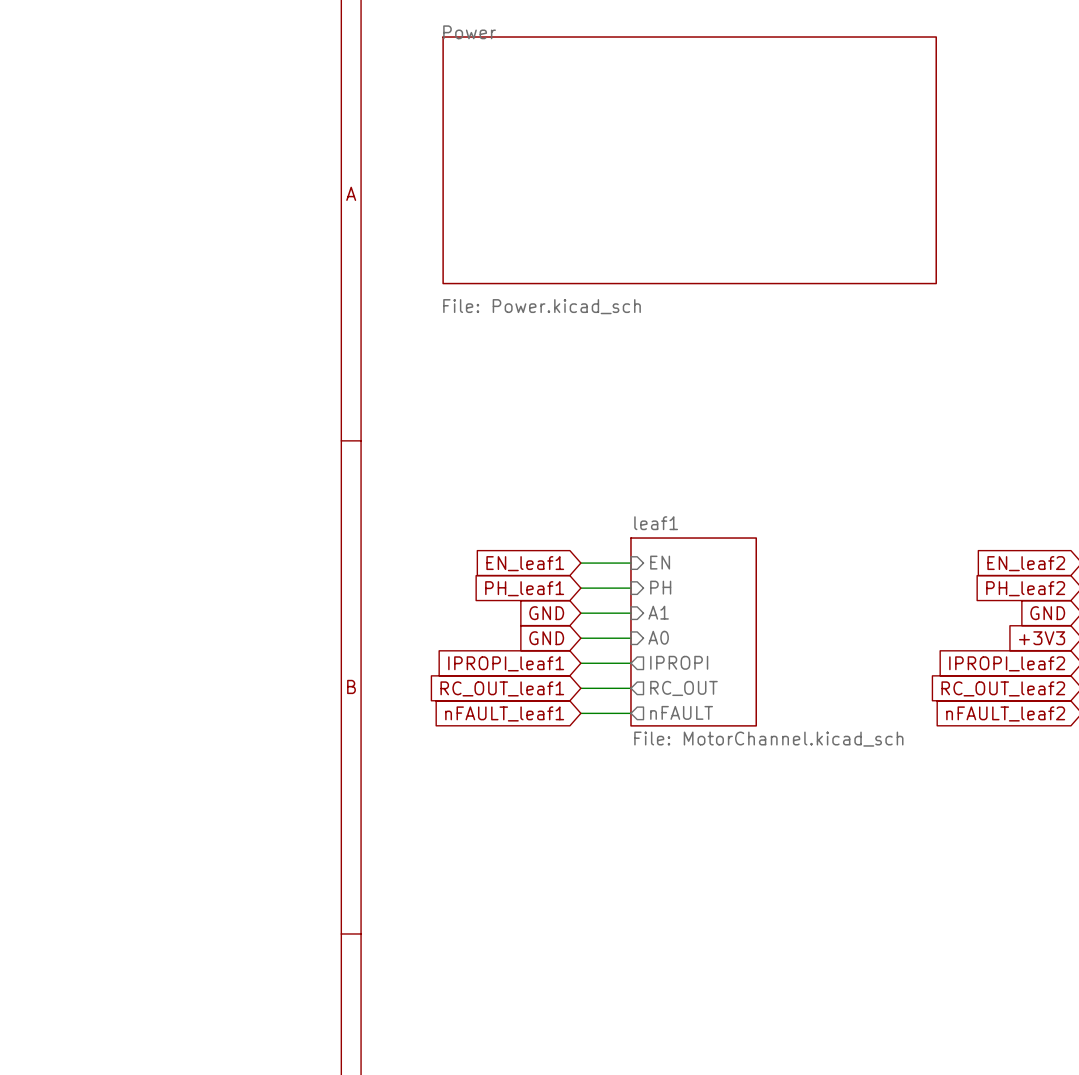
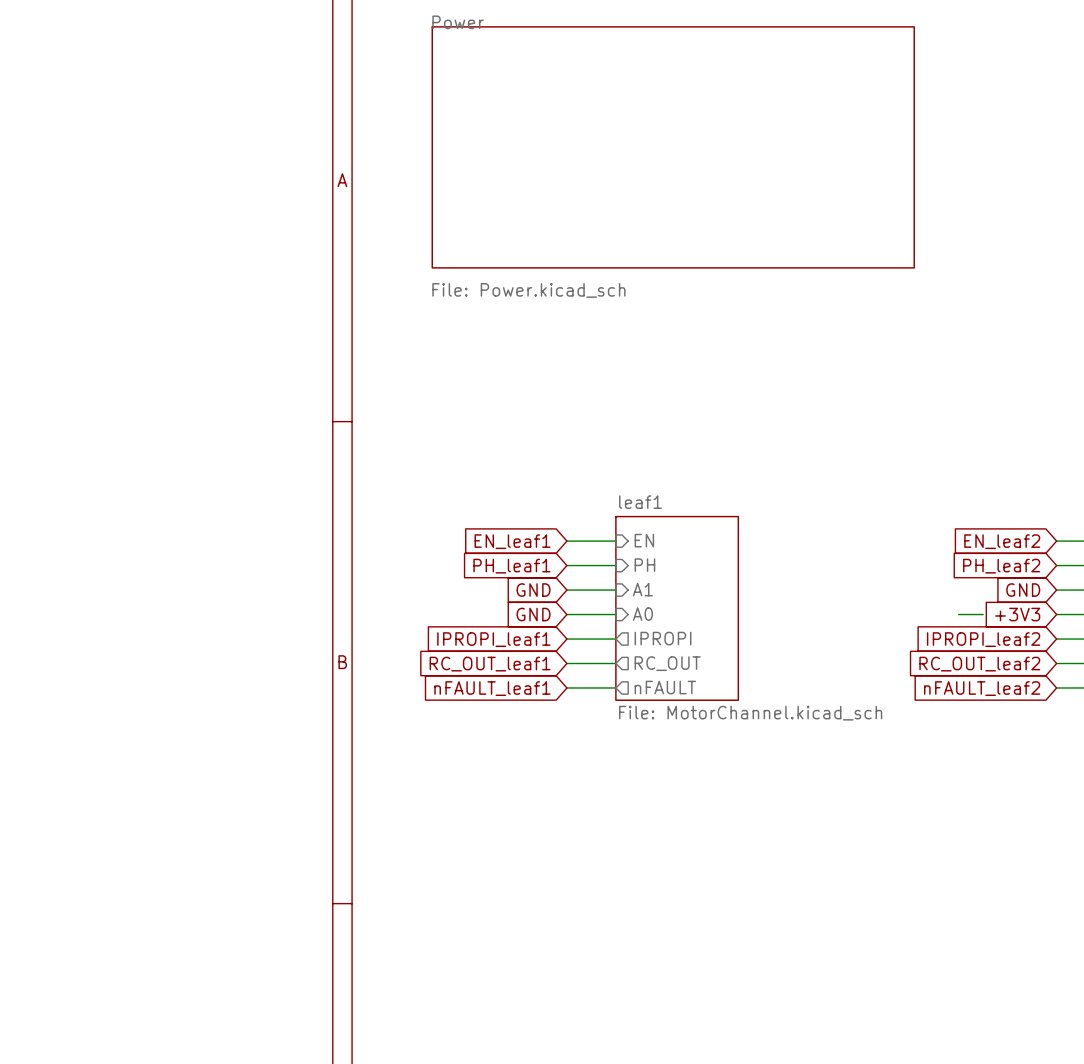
wire: none -> (958, 614) (983, 614)

